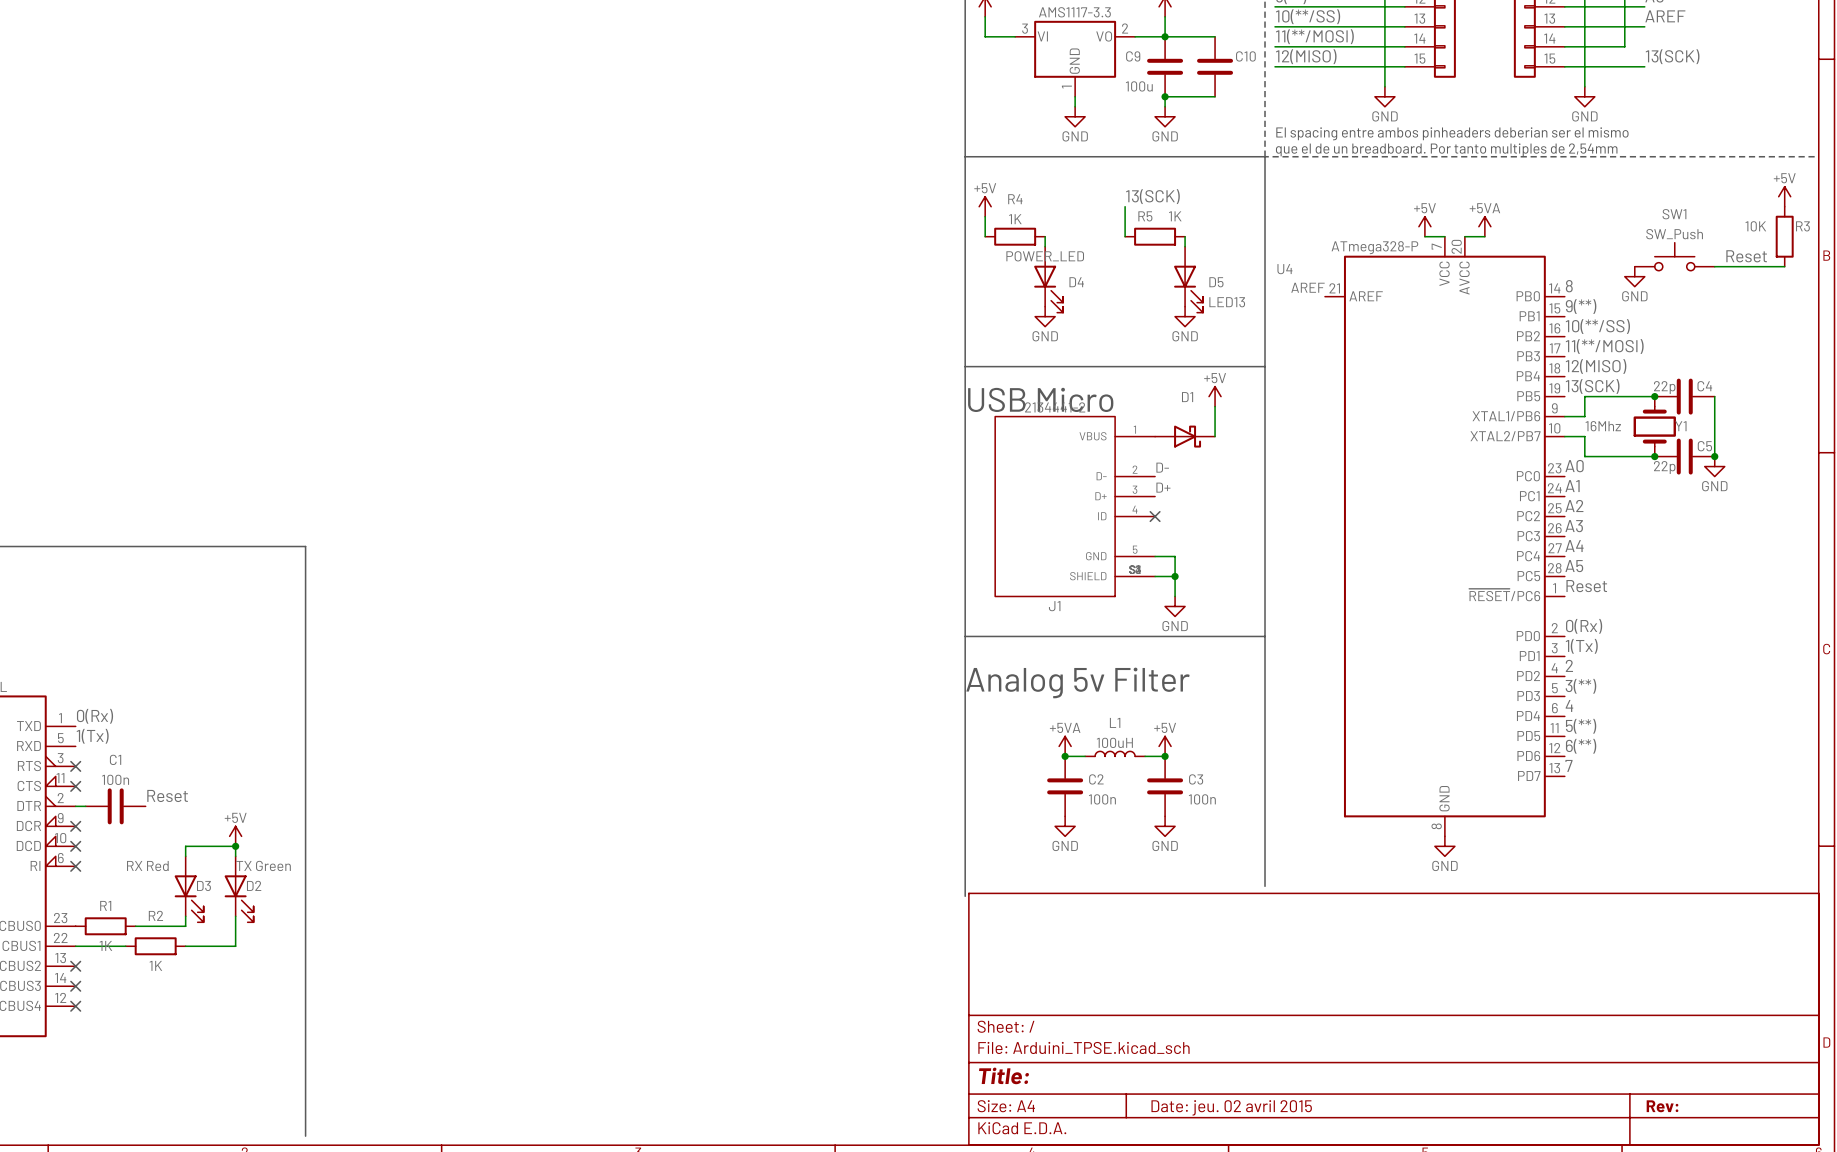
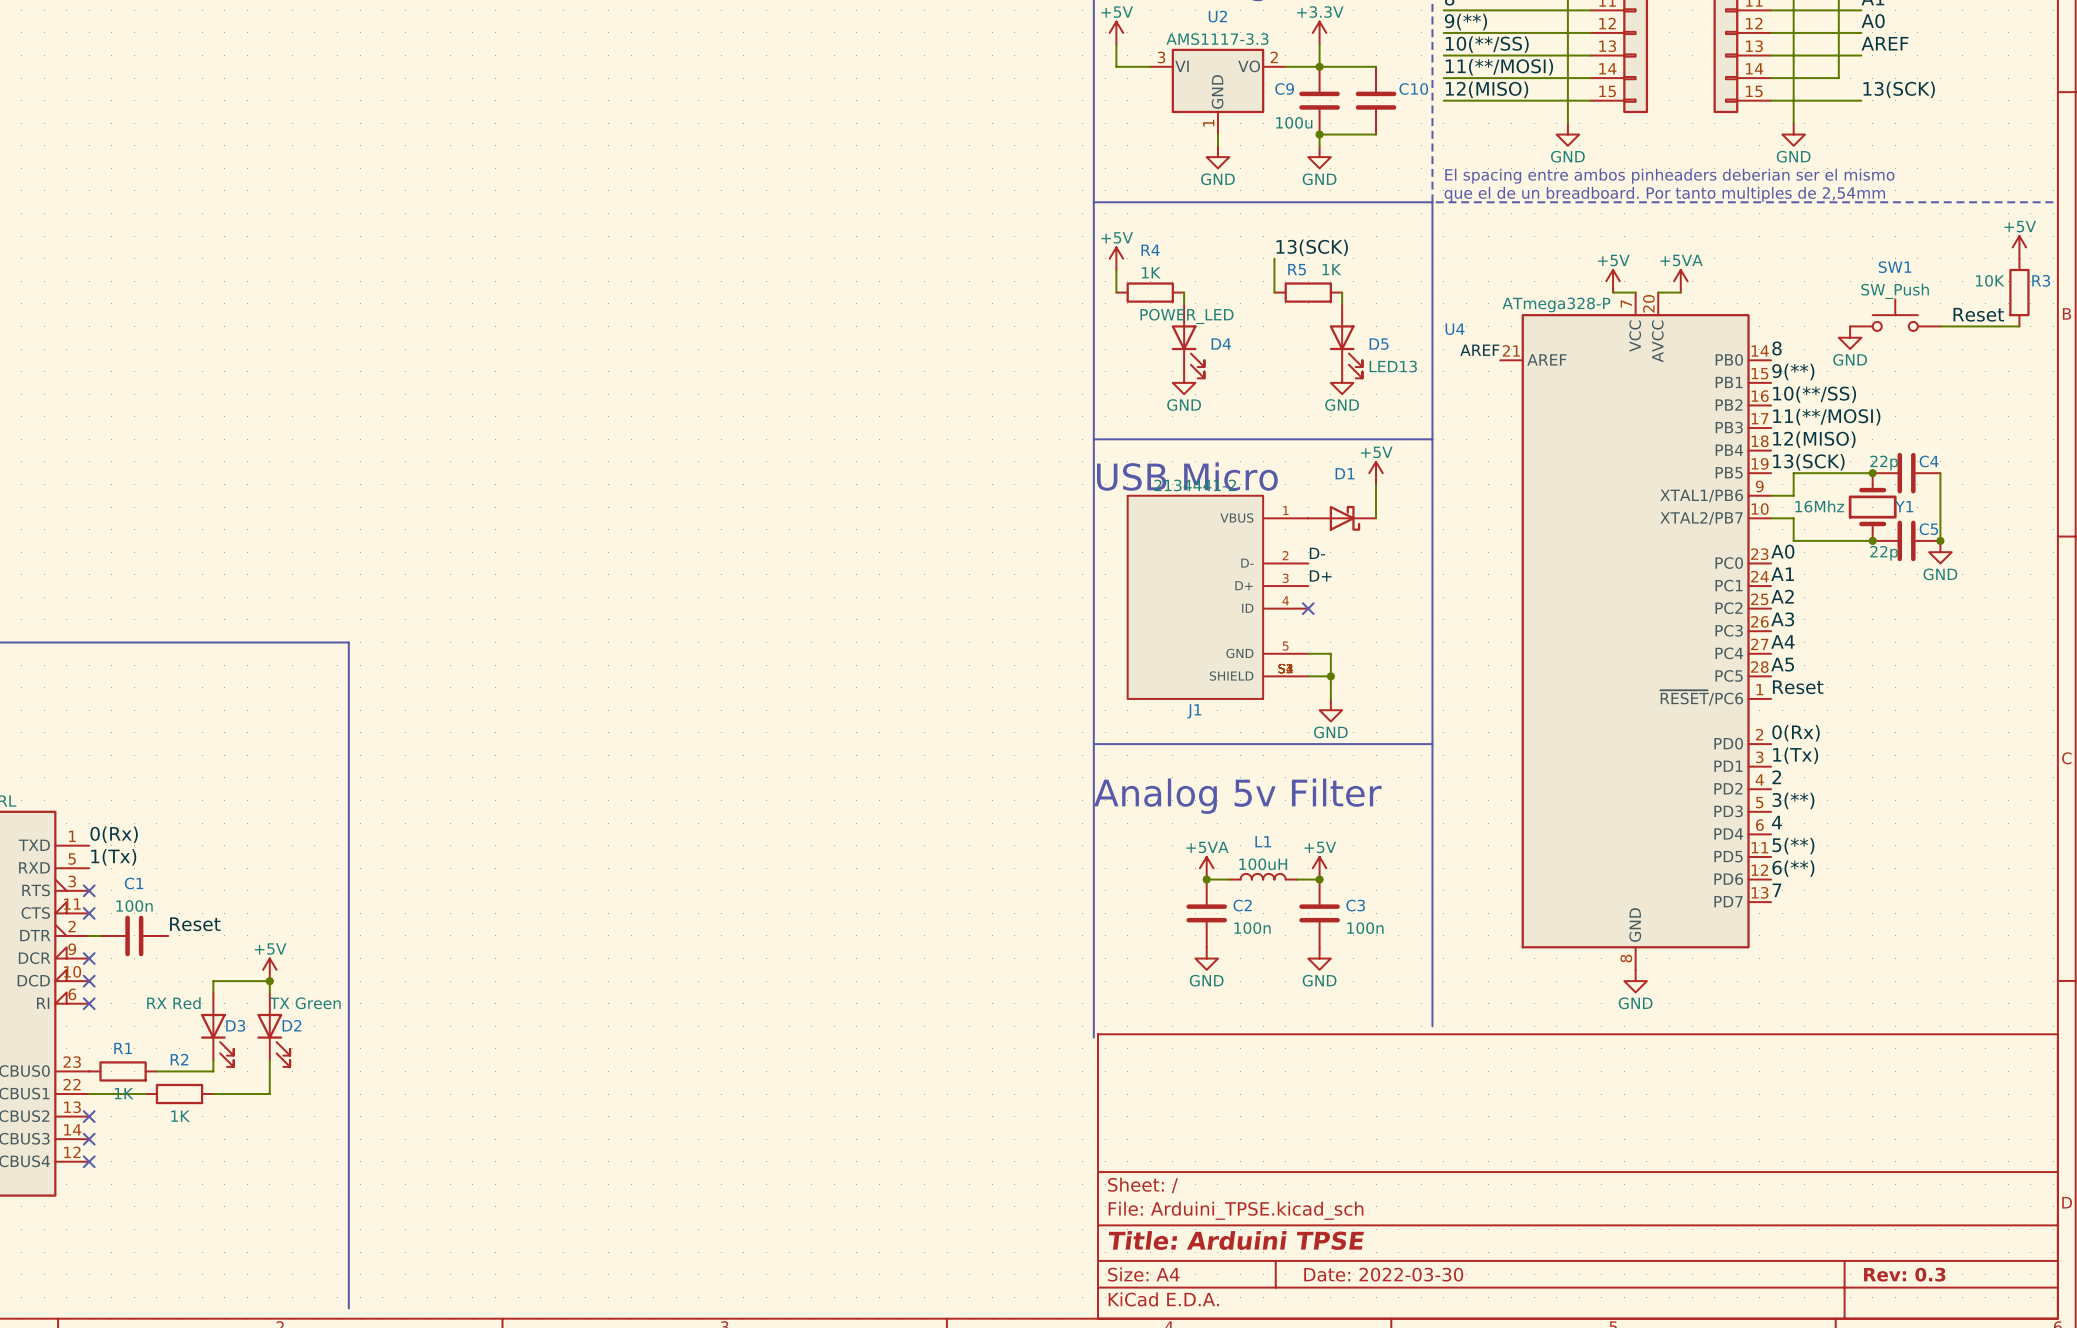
title block: Title: (1004, 1075) -> Title: Arduini TPSE (1236, 1240)
title block: Rev: (1662, 1106) -> Rev: 0.3 (1904, 1274)
title block: Date: jeu. 02 avril 2015 (1231, 1107) -> Date: 2022-03-30 (1383, 1274)

